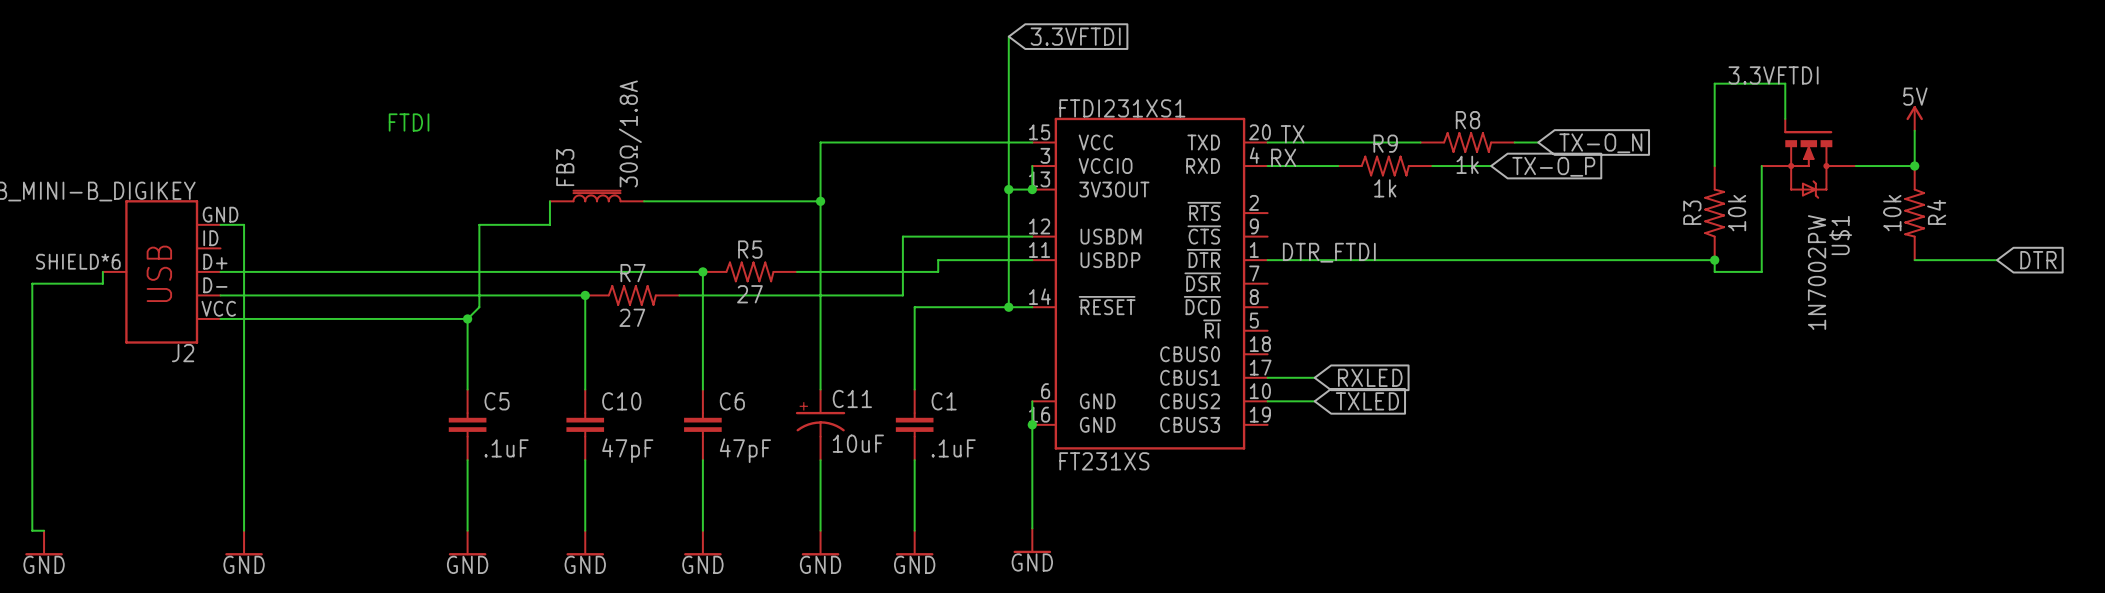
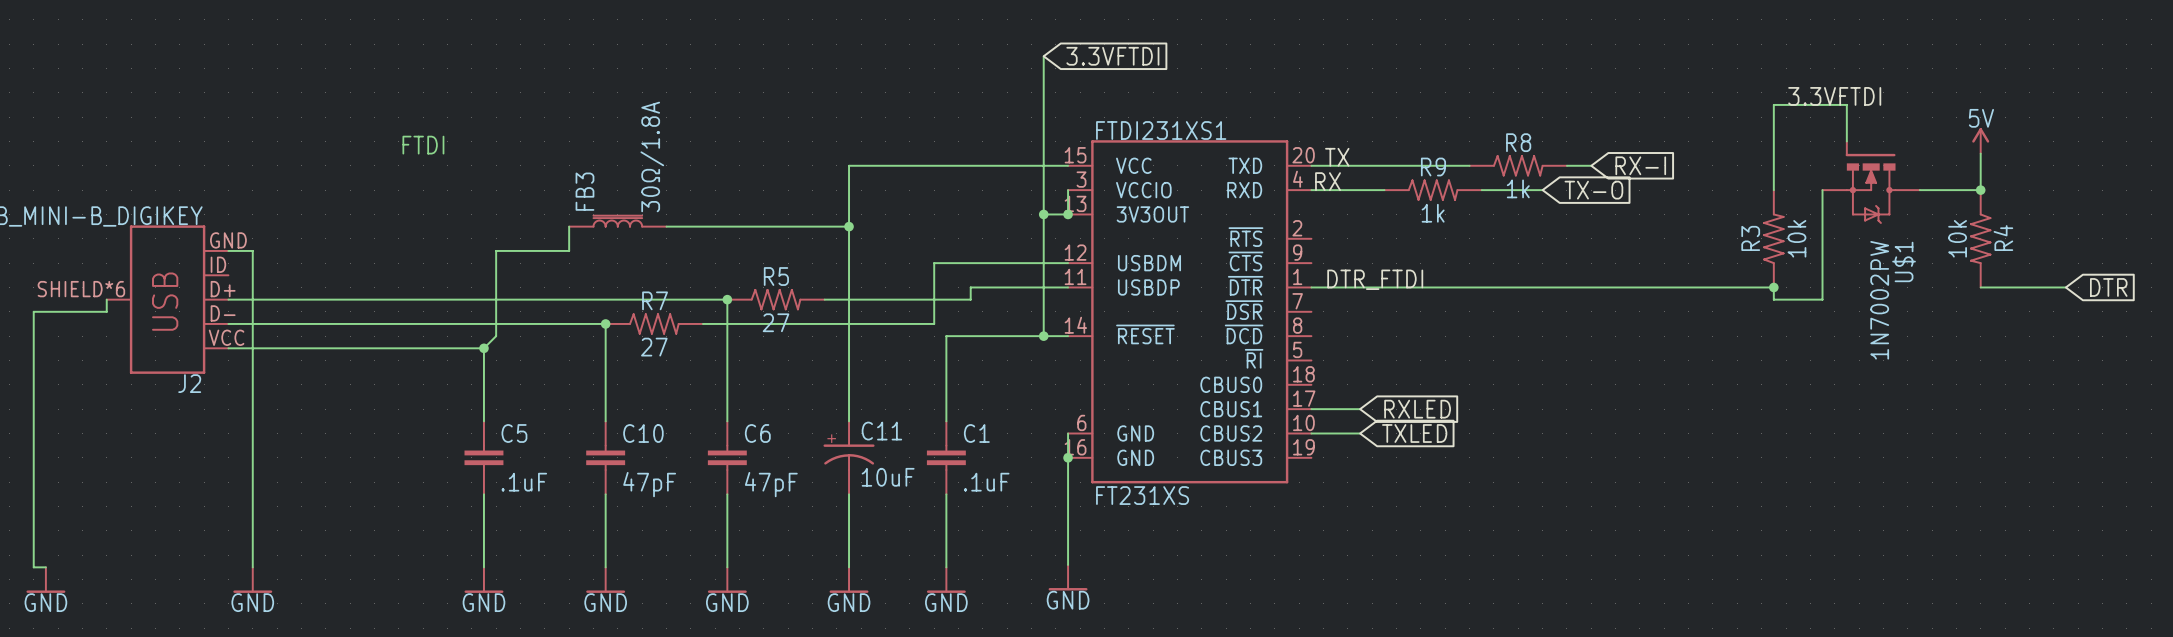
global label: TX-O_N (1600, 143) -> RX-I (1640, 165)
global label: TX-O_P (1553, 166) -> TX-O (1593, 190)

